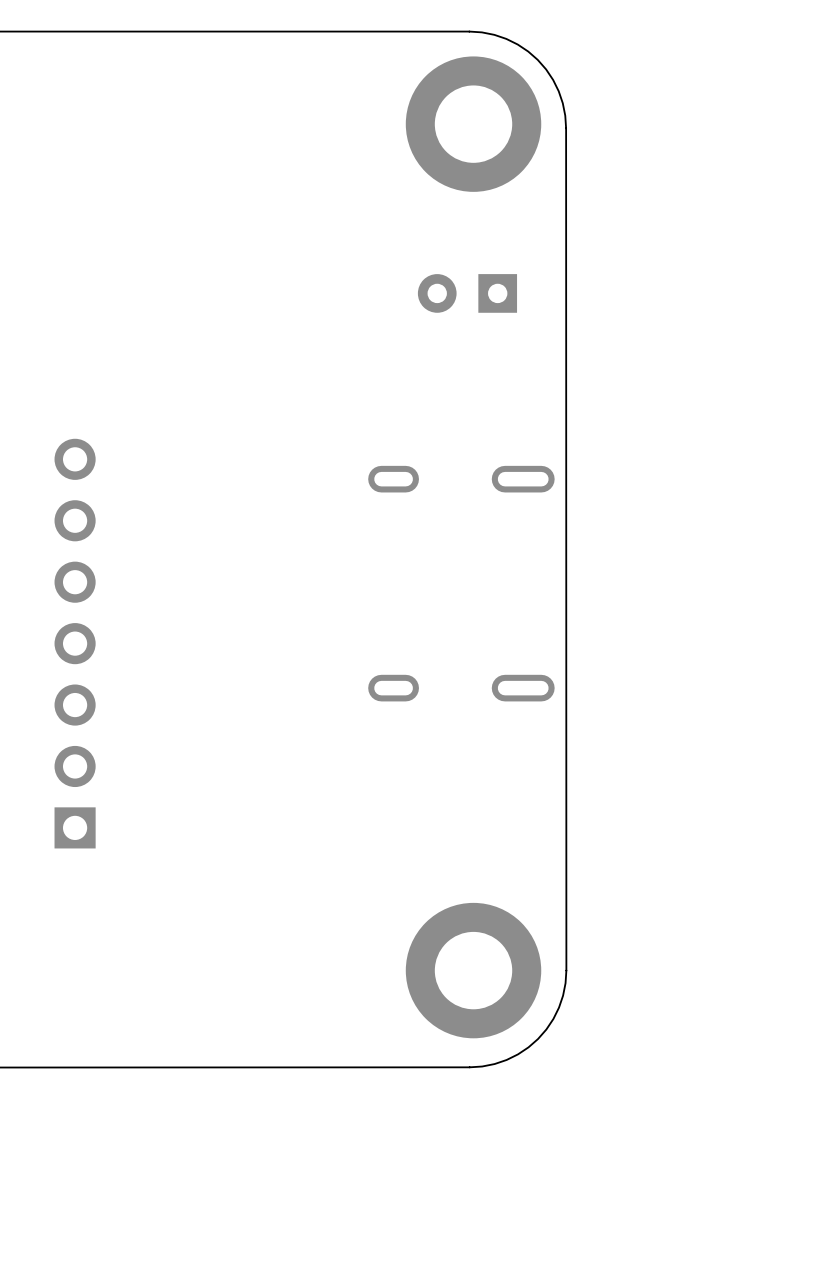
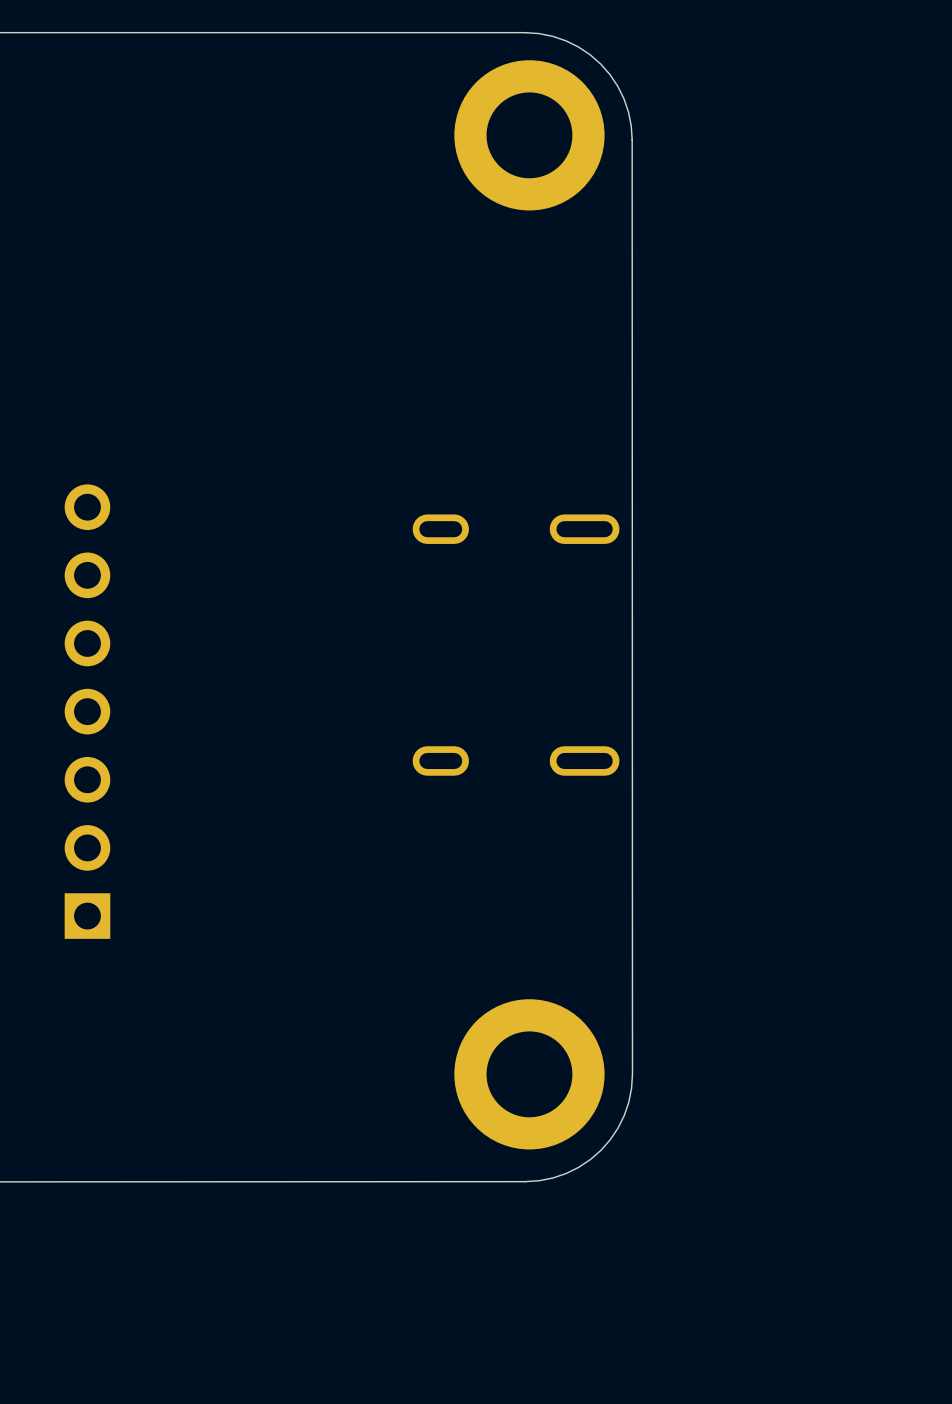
part: (467, 293) -> none

